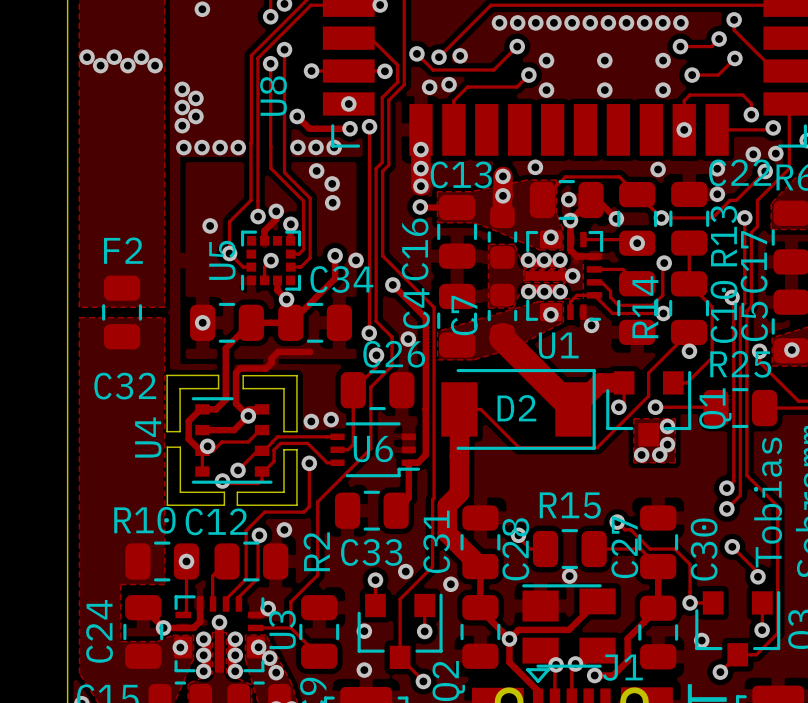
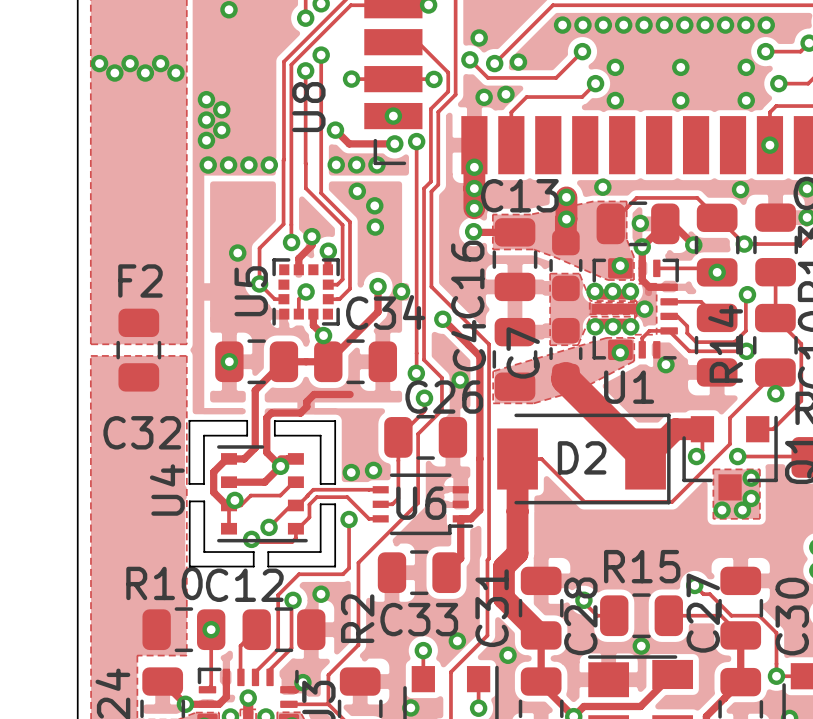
via: none -> (479, 37)

